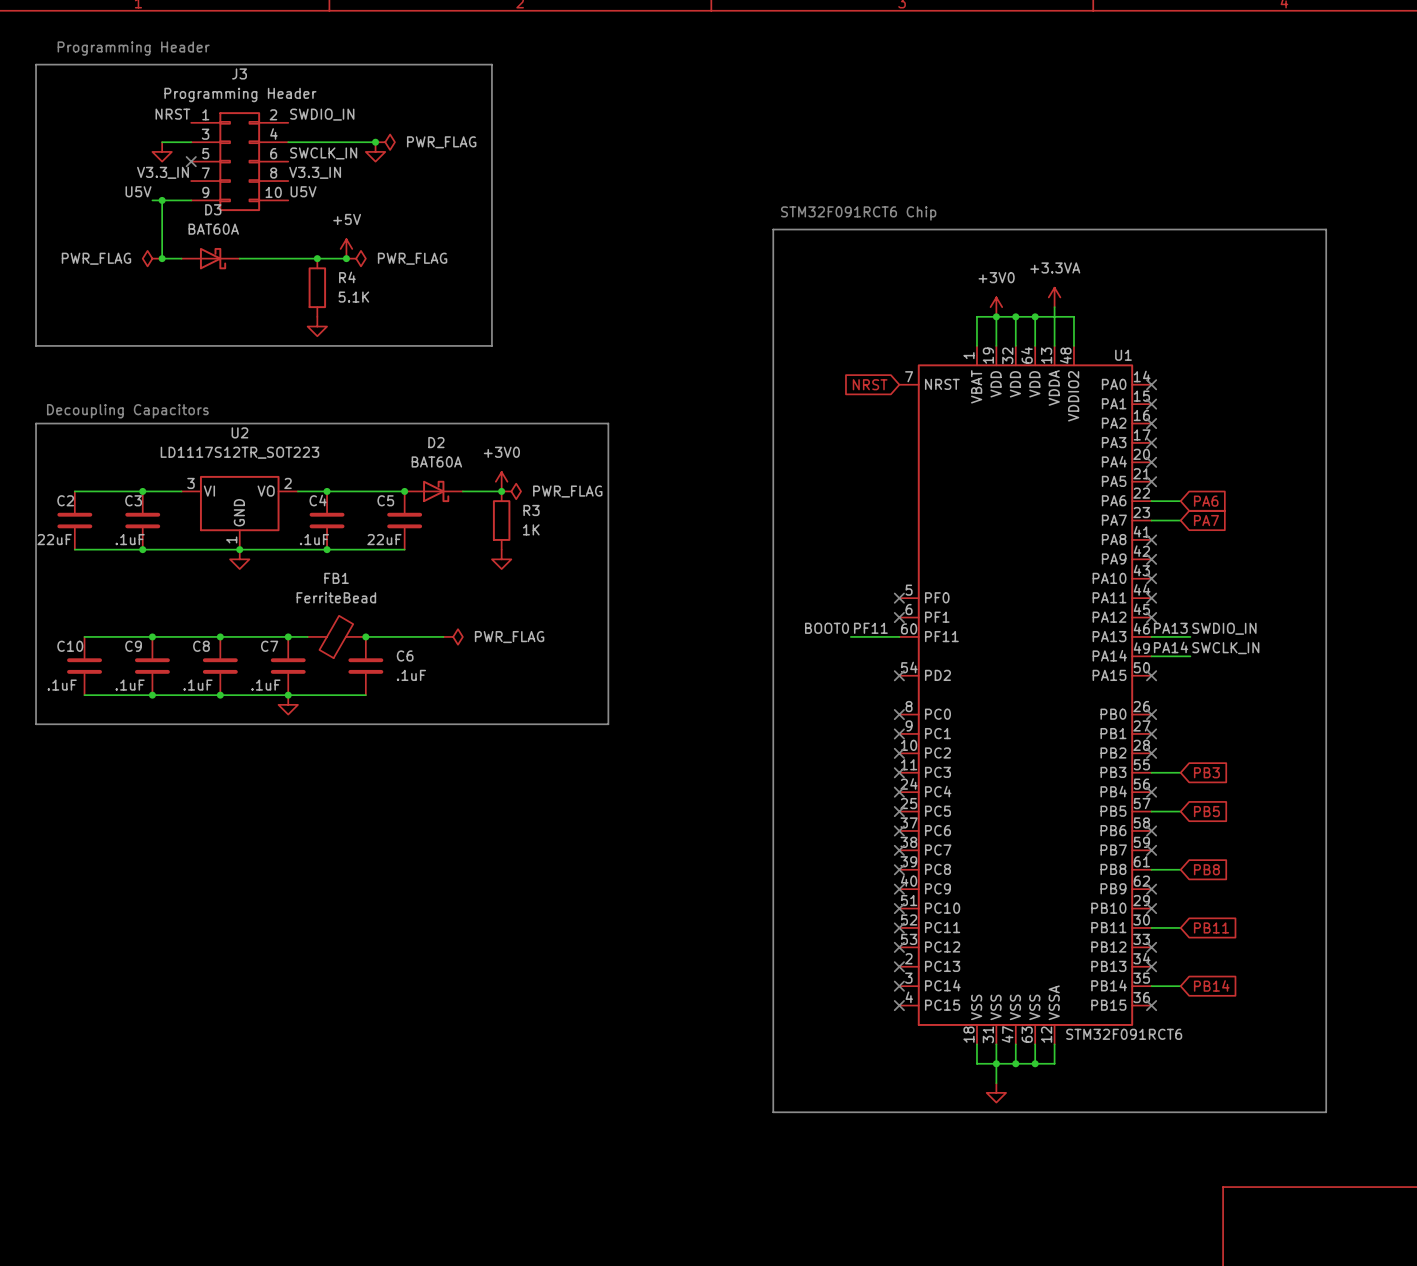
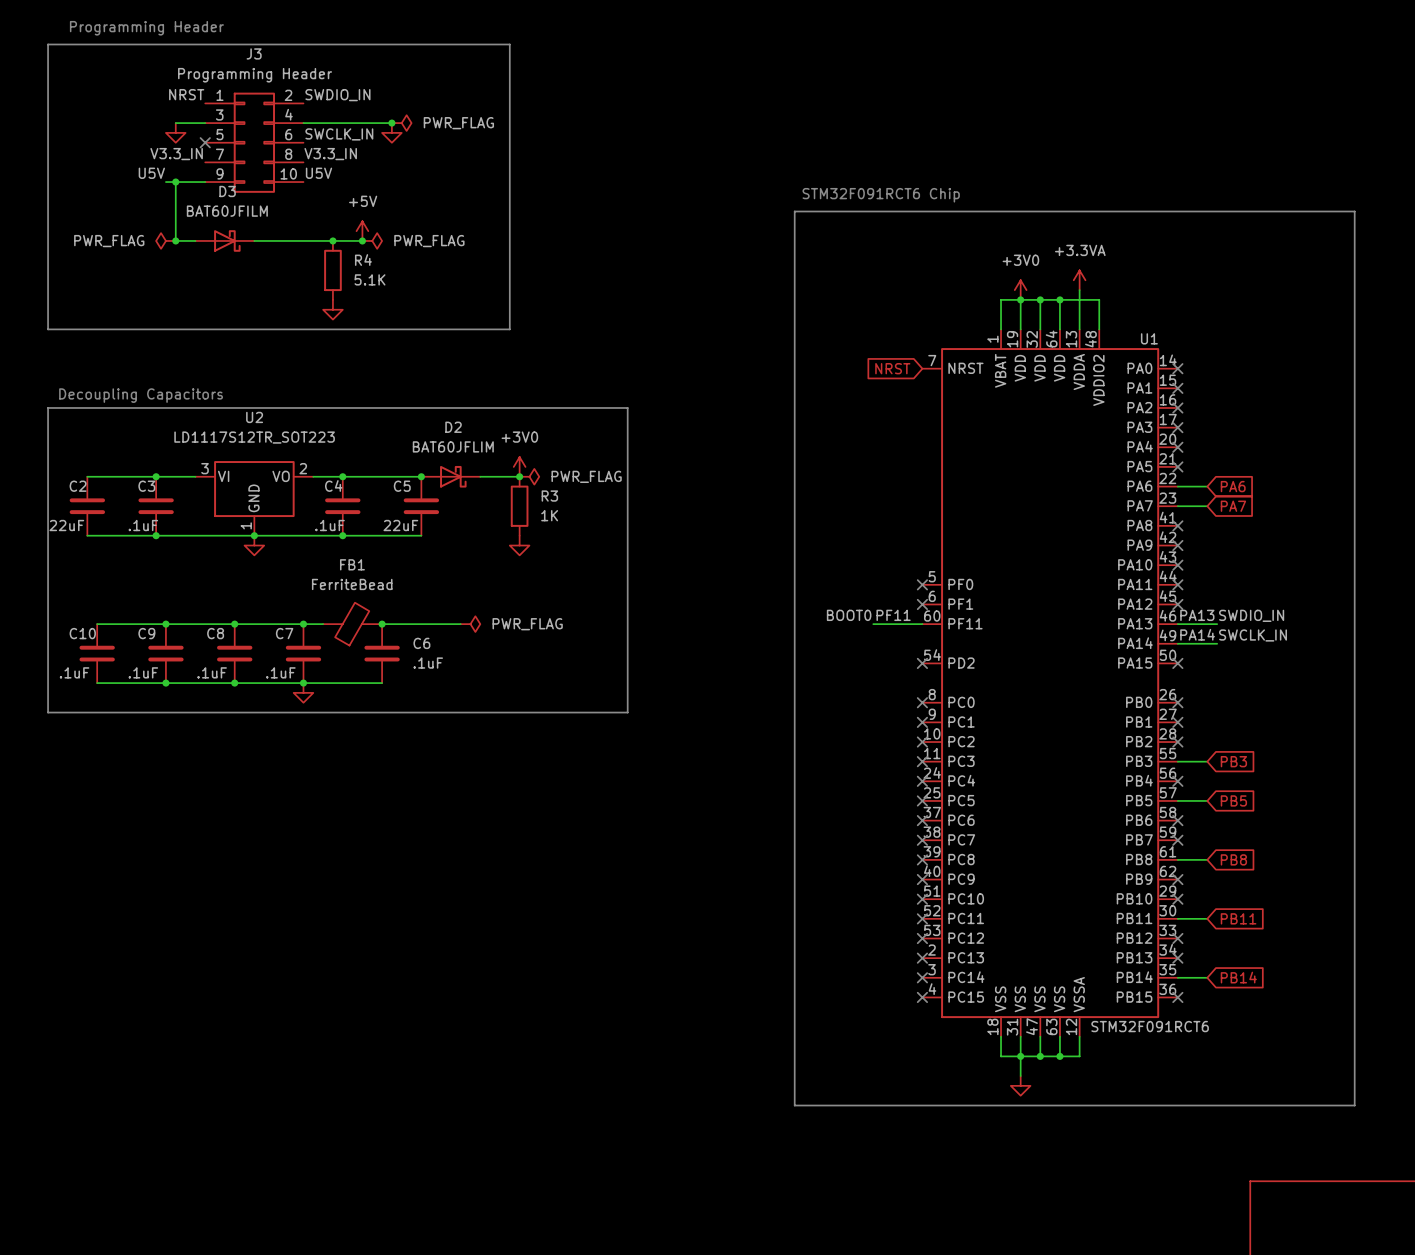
D3 value: BAT60A (213, 229) -> BAT60JFILM (227, 211)
D2 value: BAT60A (436, 461) -> BAT60JFLIM (453, 446)

